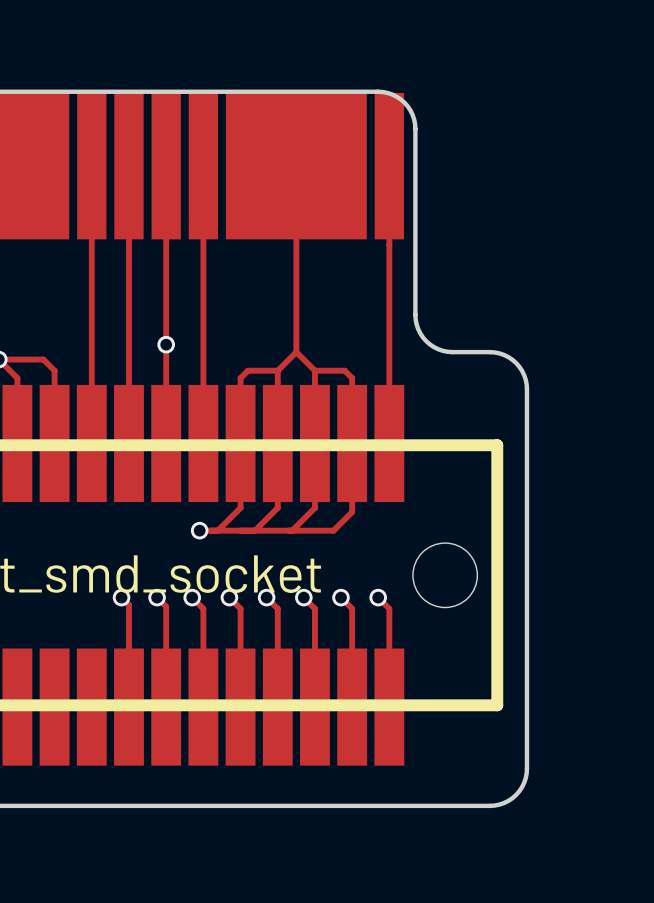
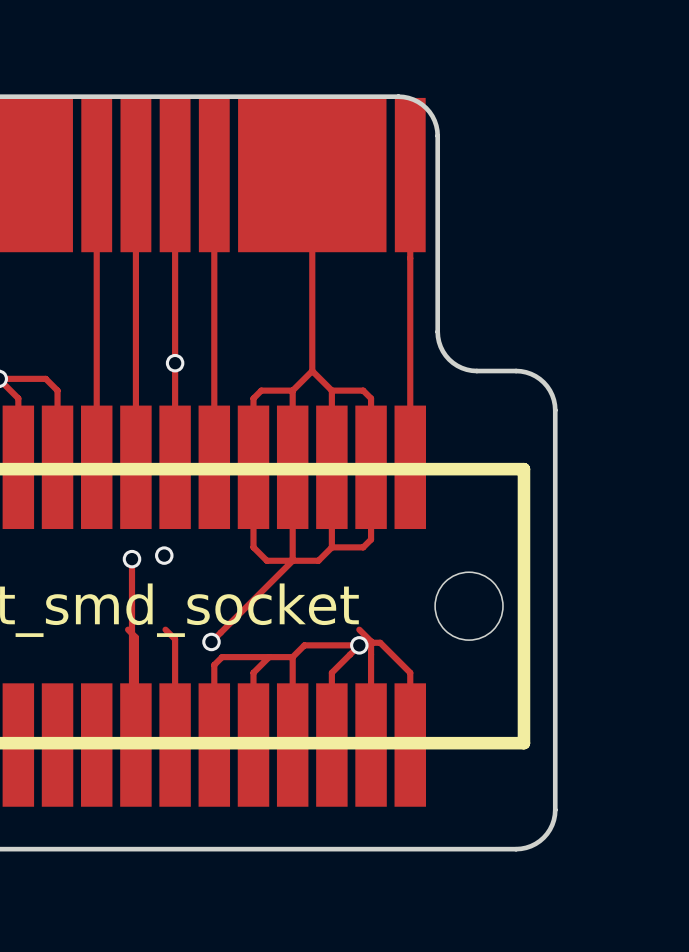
track: (240, 507) (217, 530) -> (253, 535) (253, 547) (266, 560) (318, 560) (331, 547)
track: (277, 507) (255, 530) -> (292, 535) (292, 560) (211, 641)
track: (314, 507) (292, 530) -> (331, 535) (331, 547)
track: (344, 519) (333, 530) (199, 530) -> (363, 547) (331, 547)
via: none -> (164, 555)
via: none -> (132, 559)
via: (199, 530) -> none
track: none -> (135, 563) (132, 559) (132, 741)
via: (121, 597) -> none
via: (157, 597) -> none
track: (192, 597) (203, 608) (203, 631) -> (359, 645) (304, 645) (292, 657) (222, 657) (214, 664)
via position: (192, 597) -> (211, 641)
track: (229, 597) (240, 608) (240, 638) -> (269, 657) (253, 672)
via: (229, 597) -> none
track: (266, 597) (277, 608) (277, 623) -> none
via: (266, 597) -> none
track: (303, 597) (314, 608) (314, 638) -> (359, 645) (331, 672)
via: (303, 597) -> none
via position: (341, 597) -> (359, 645)
track: (378, 597) (389, 608) (389, 638) -> (359, 645) (359, 642) (380, 642) (410, 672)
via: (378, 597) -> none

